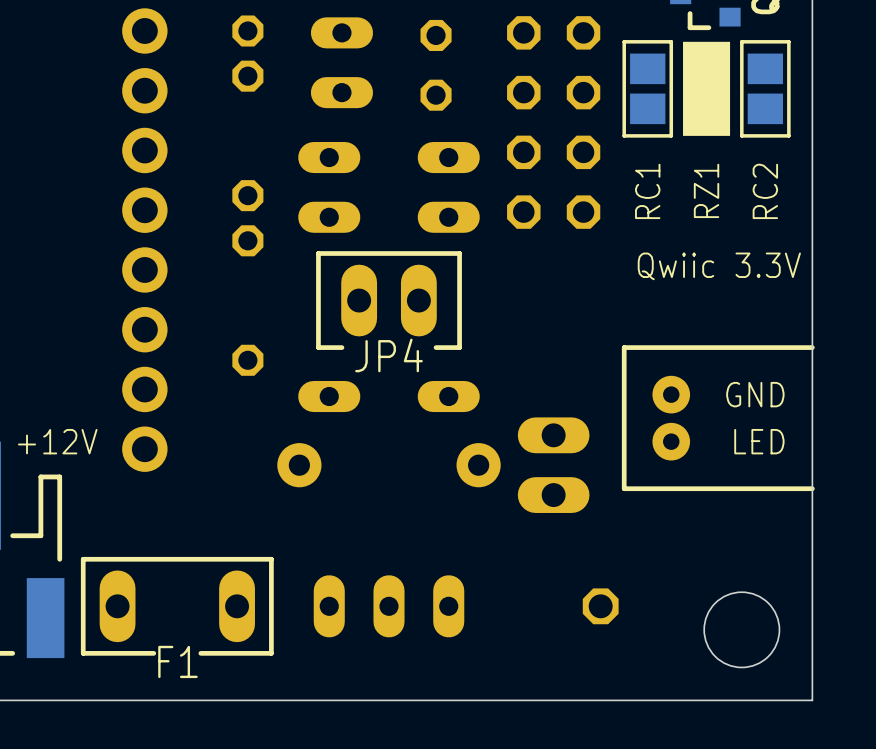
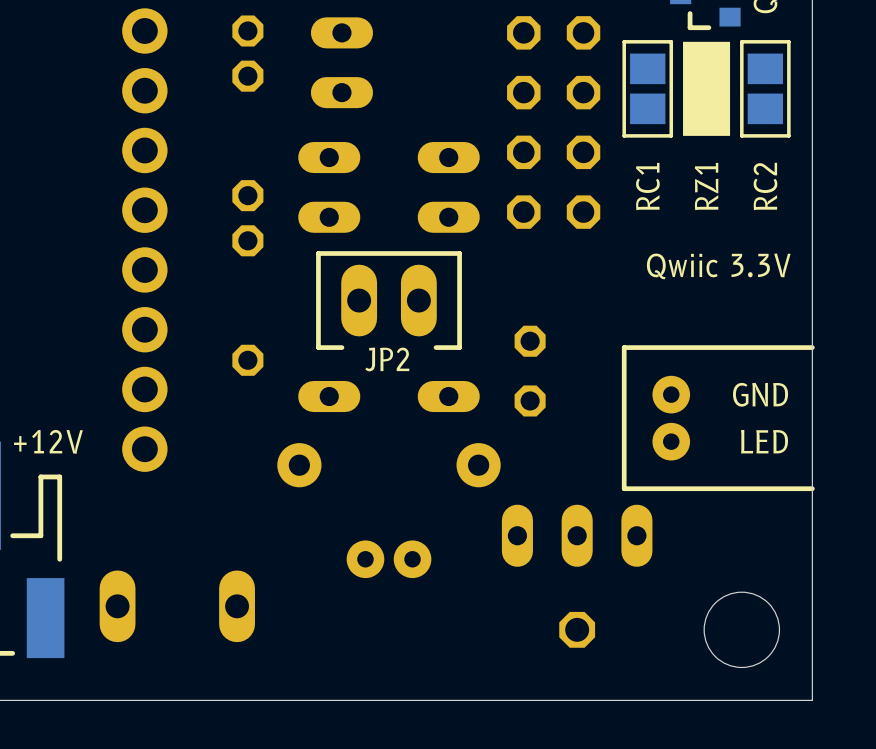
part position: (436, 65) -> (530, 371)
text: JP4 (389, 355) -> JP2 (387, 359)
part: (553, 465) -> none
part: none -> (389, 559)
part position: (389, 606) -> (577, 535)
part position: (600, 606) -> (577, 629)
line: (200, 653) (271, 653) (271, 559) (83, 559) (83, 653) (153, 653) -> none
text: F1 (177, 661) -> none

